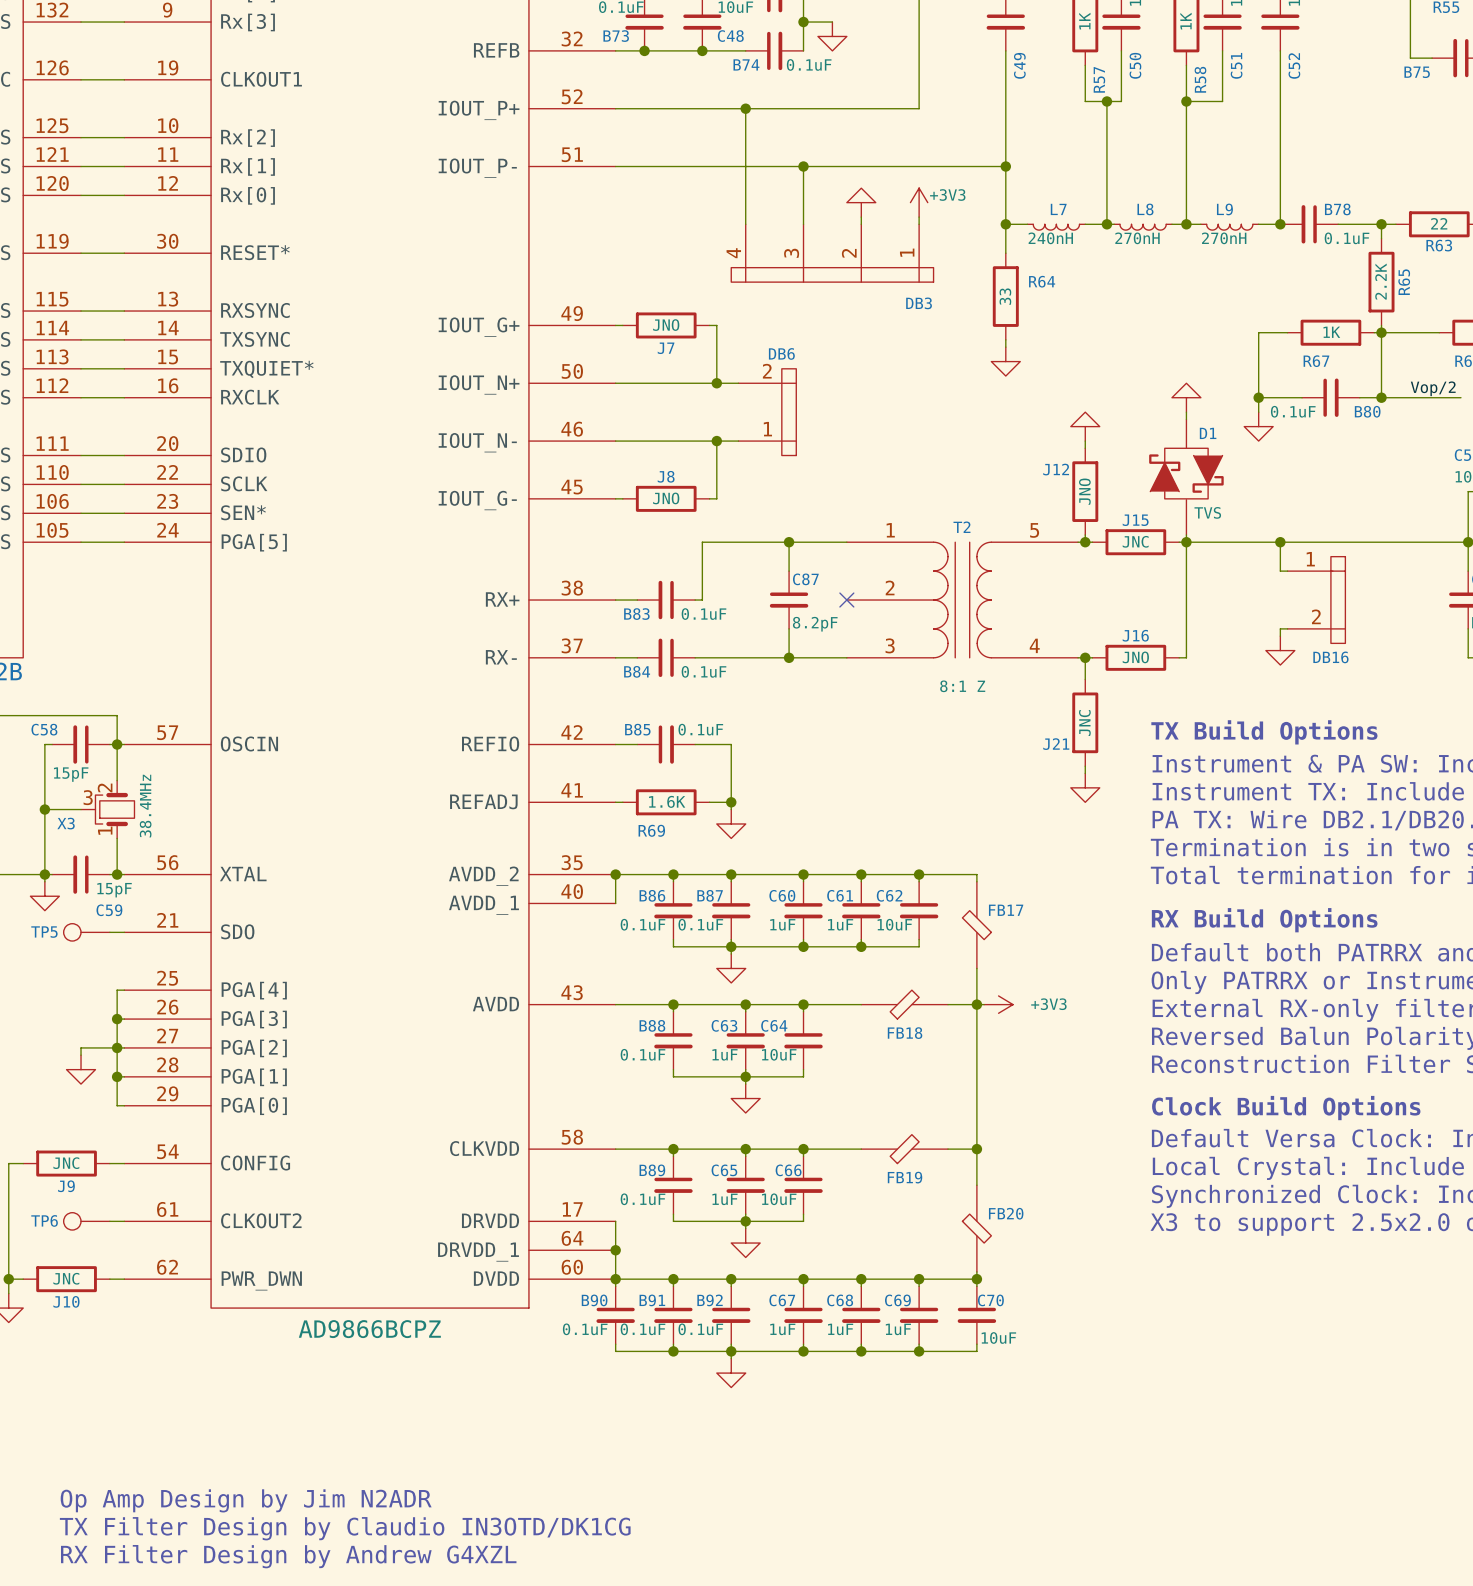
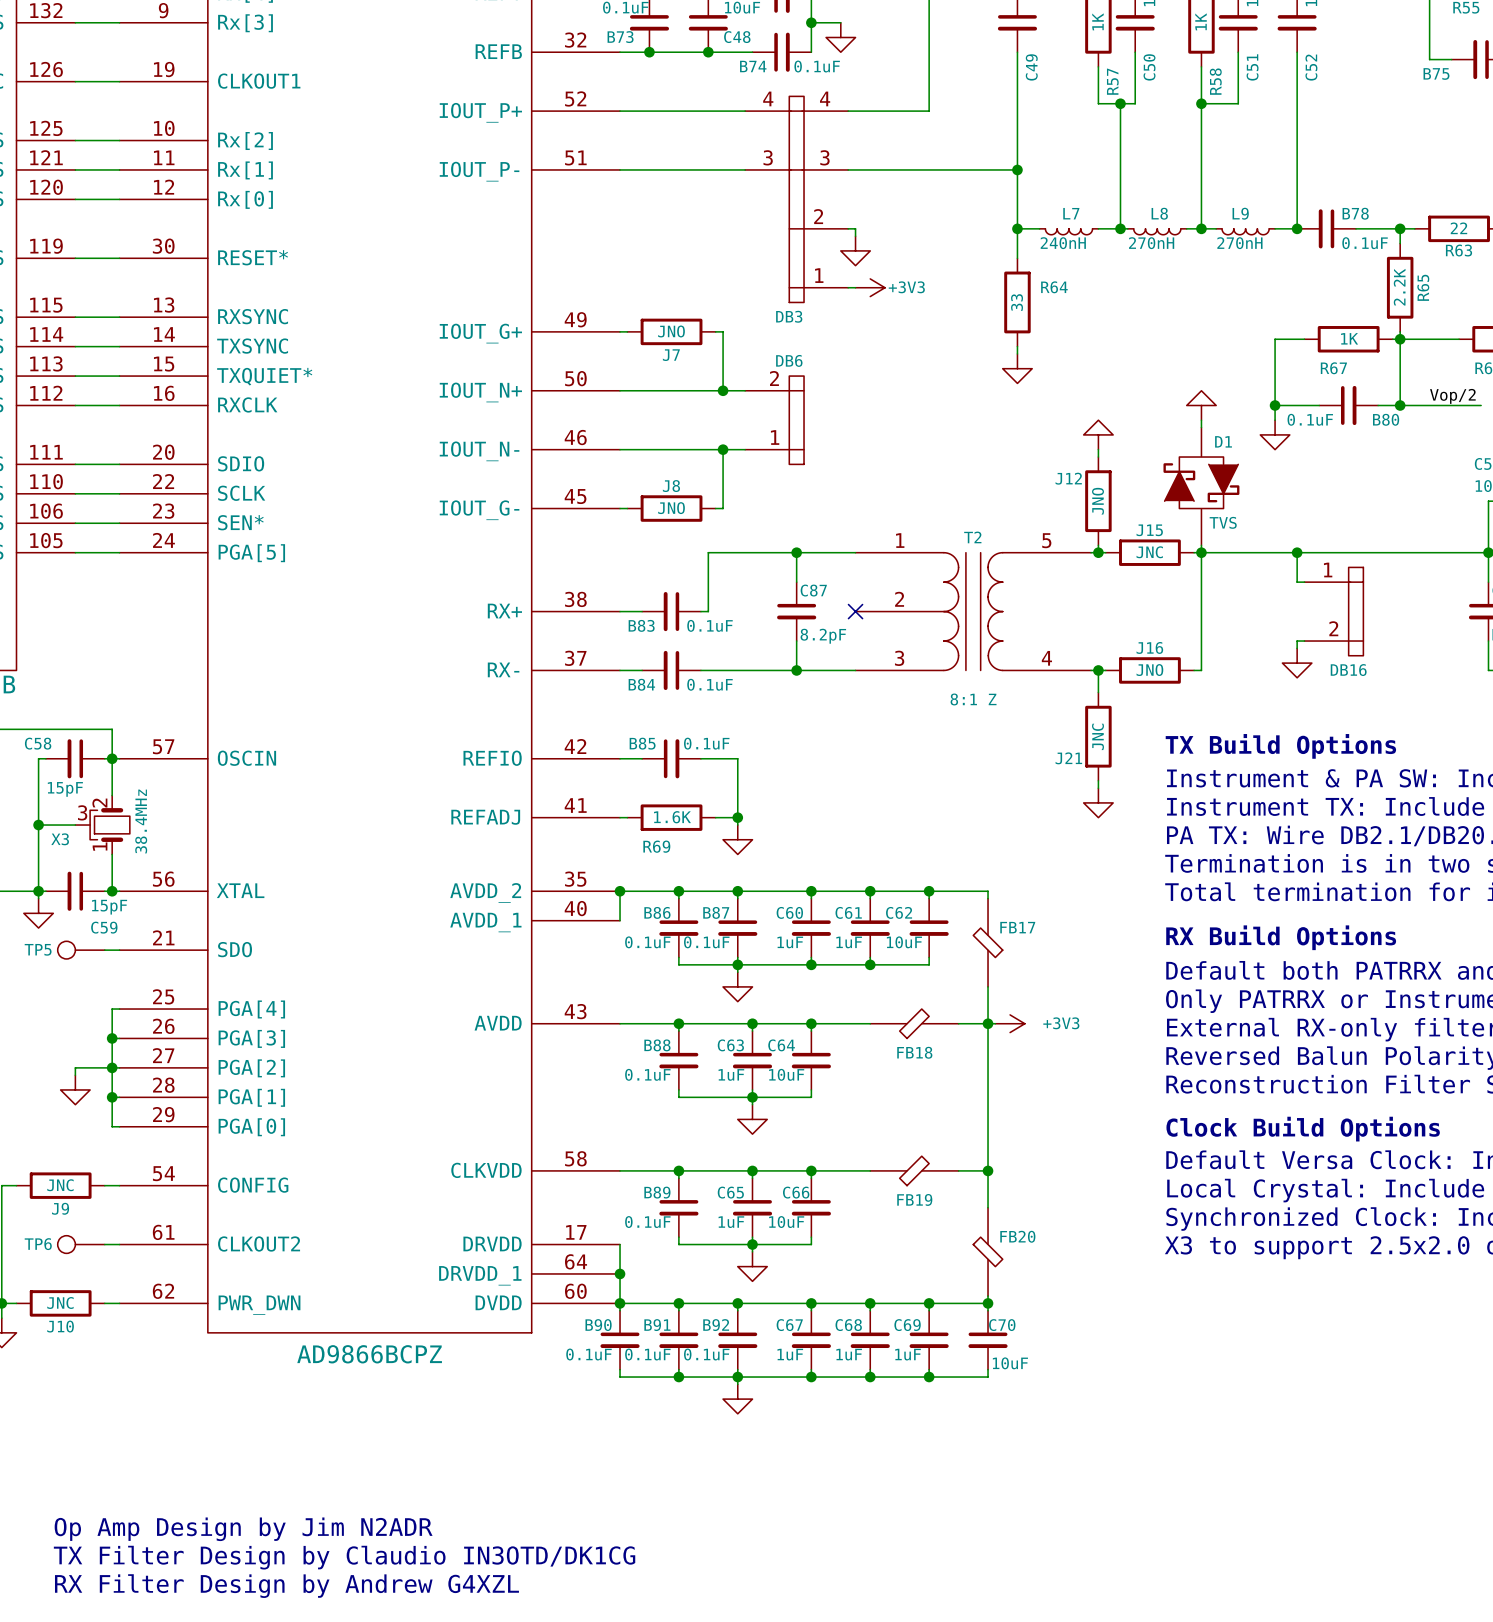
wire: (745, 108) (745, 224) -> none
junction: (745, 108) -> none
wire: (803, 166) (803, 224) -> none
junction: (803, 166) -> none
power symbol rotation: 0° (861, 202) -> 180° (855, 250)
power symbol position: (861, 202) -> (855, 250)
power symbol rotation: 0° (919, 202) -> 90° clockwise (870, 287)
power symbol position: +3V3 (919, 202) -> +3V3 (870, 287)
wire: (861, 217) (861, 224) -> none
wire: (919, 217) (919, 224) -> none
DB3 symbol: [731, 224, 934, 283] -> [745, 96, 849, 303]
wire: none -> (848, 228) (855, 228) (855, 236)
DB3 name position: DB3 (919, 303) -> DB3 (789, 316)

